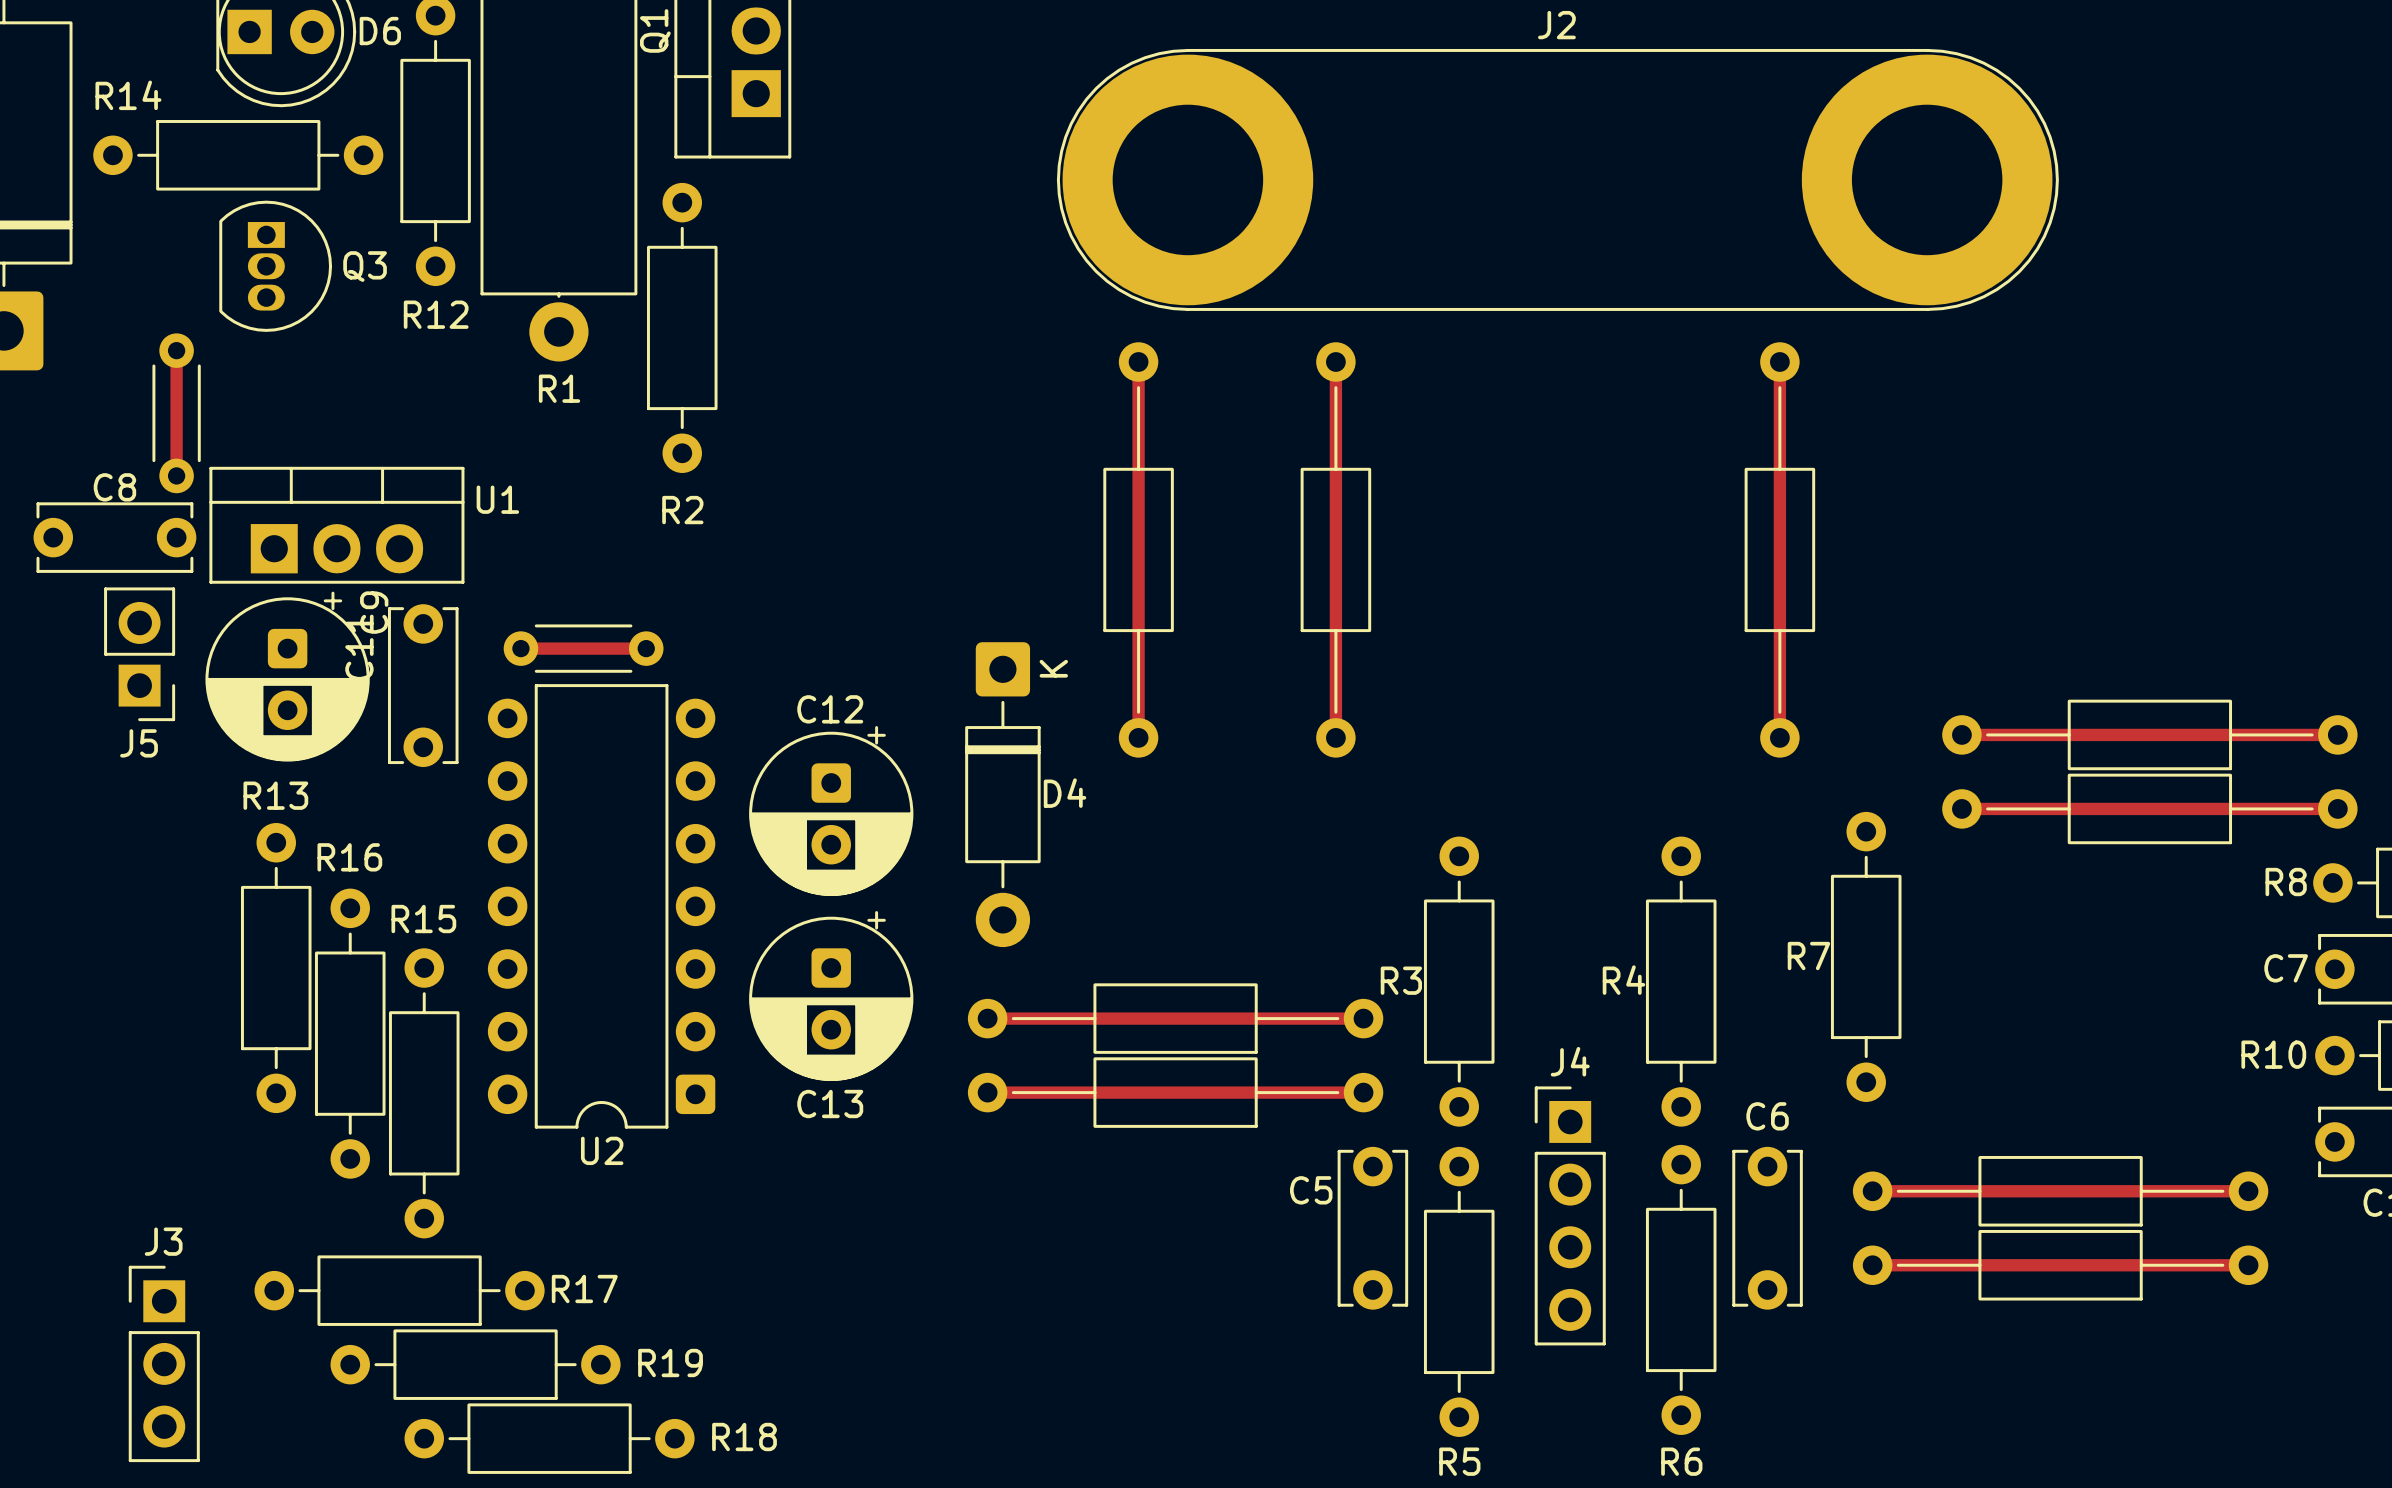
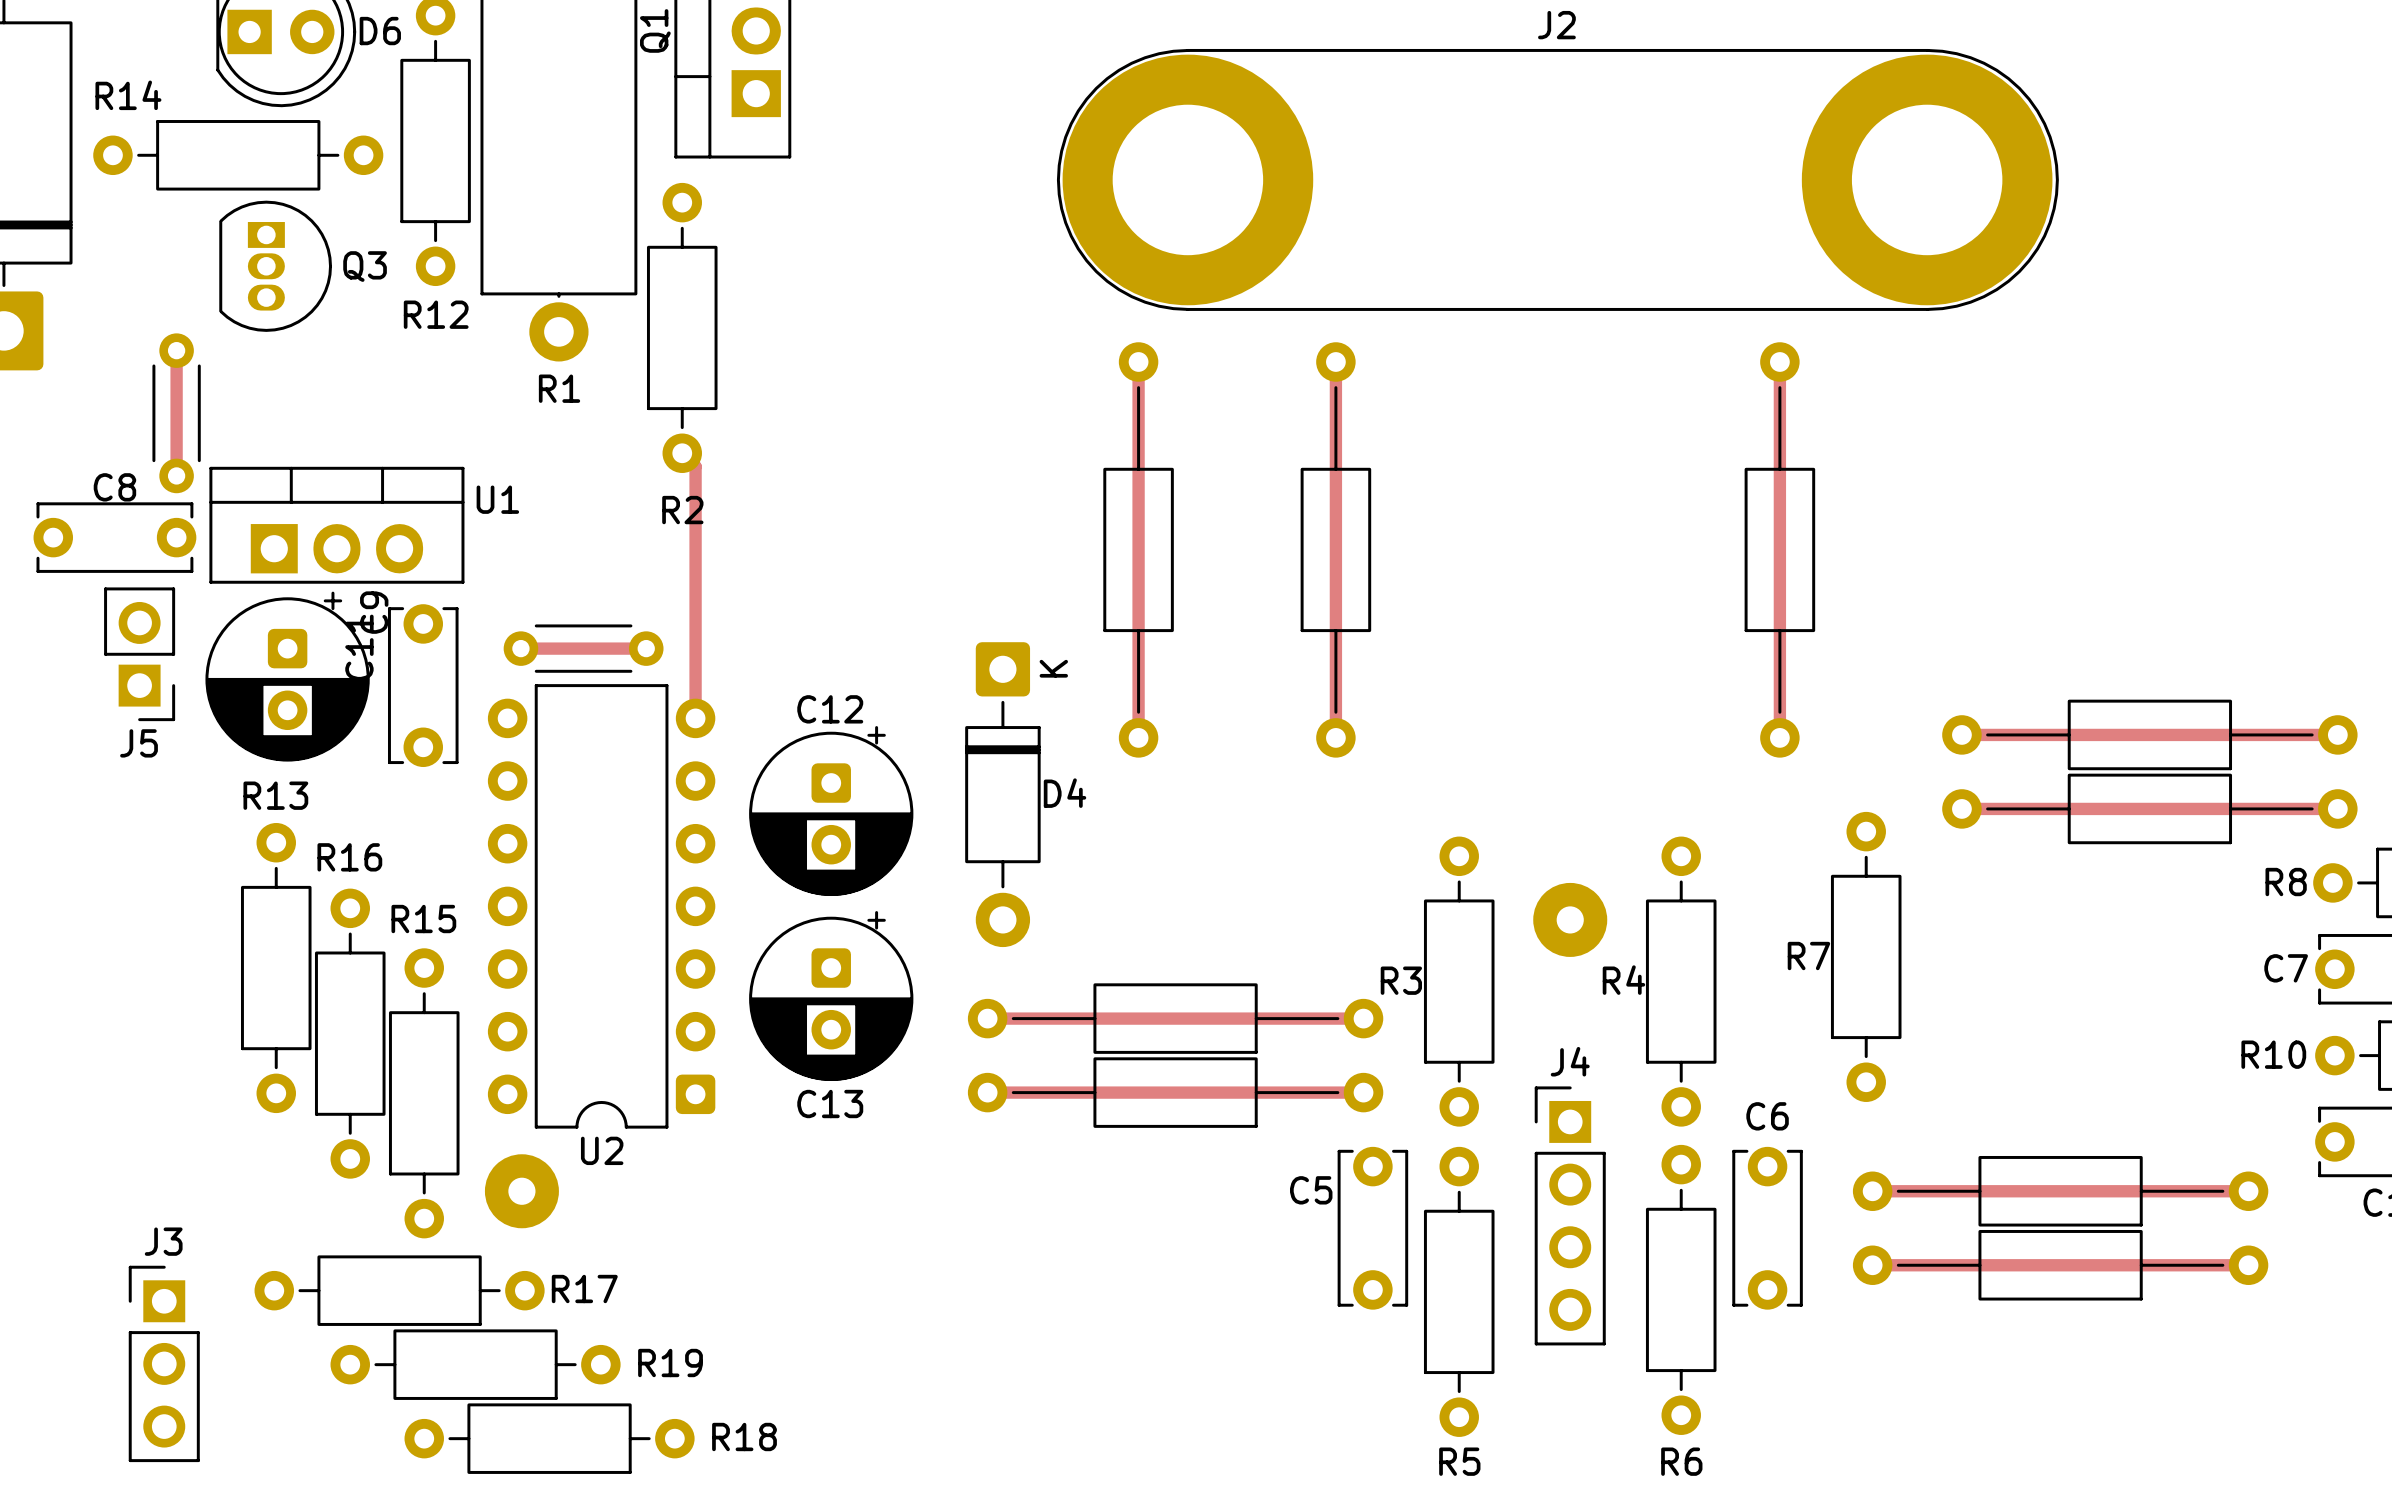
track: none -> (682, 453) (695, 466) (695, 718)
part: none -> (1570, 919)
part: none -> (521, 1191)

